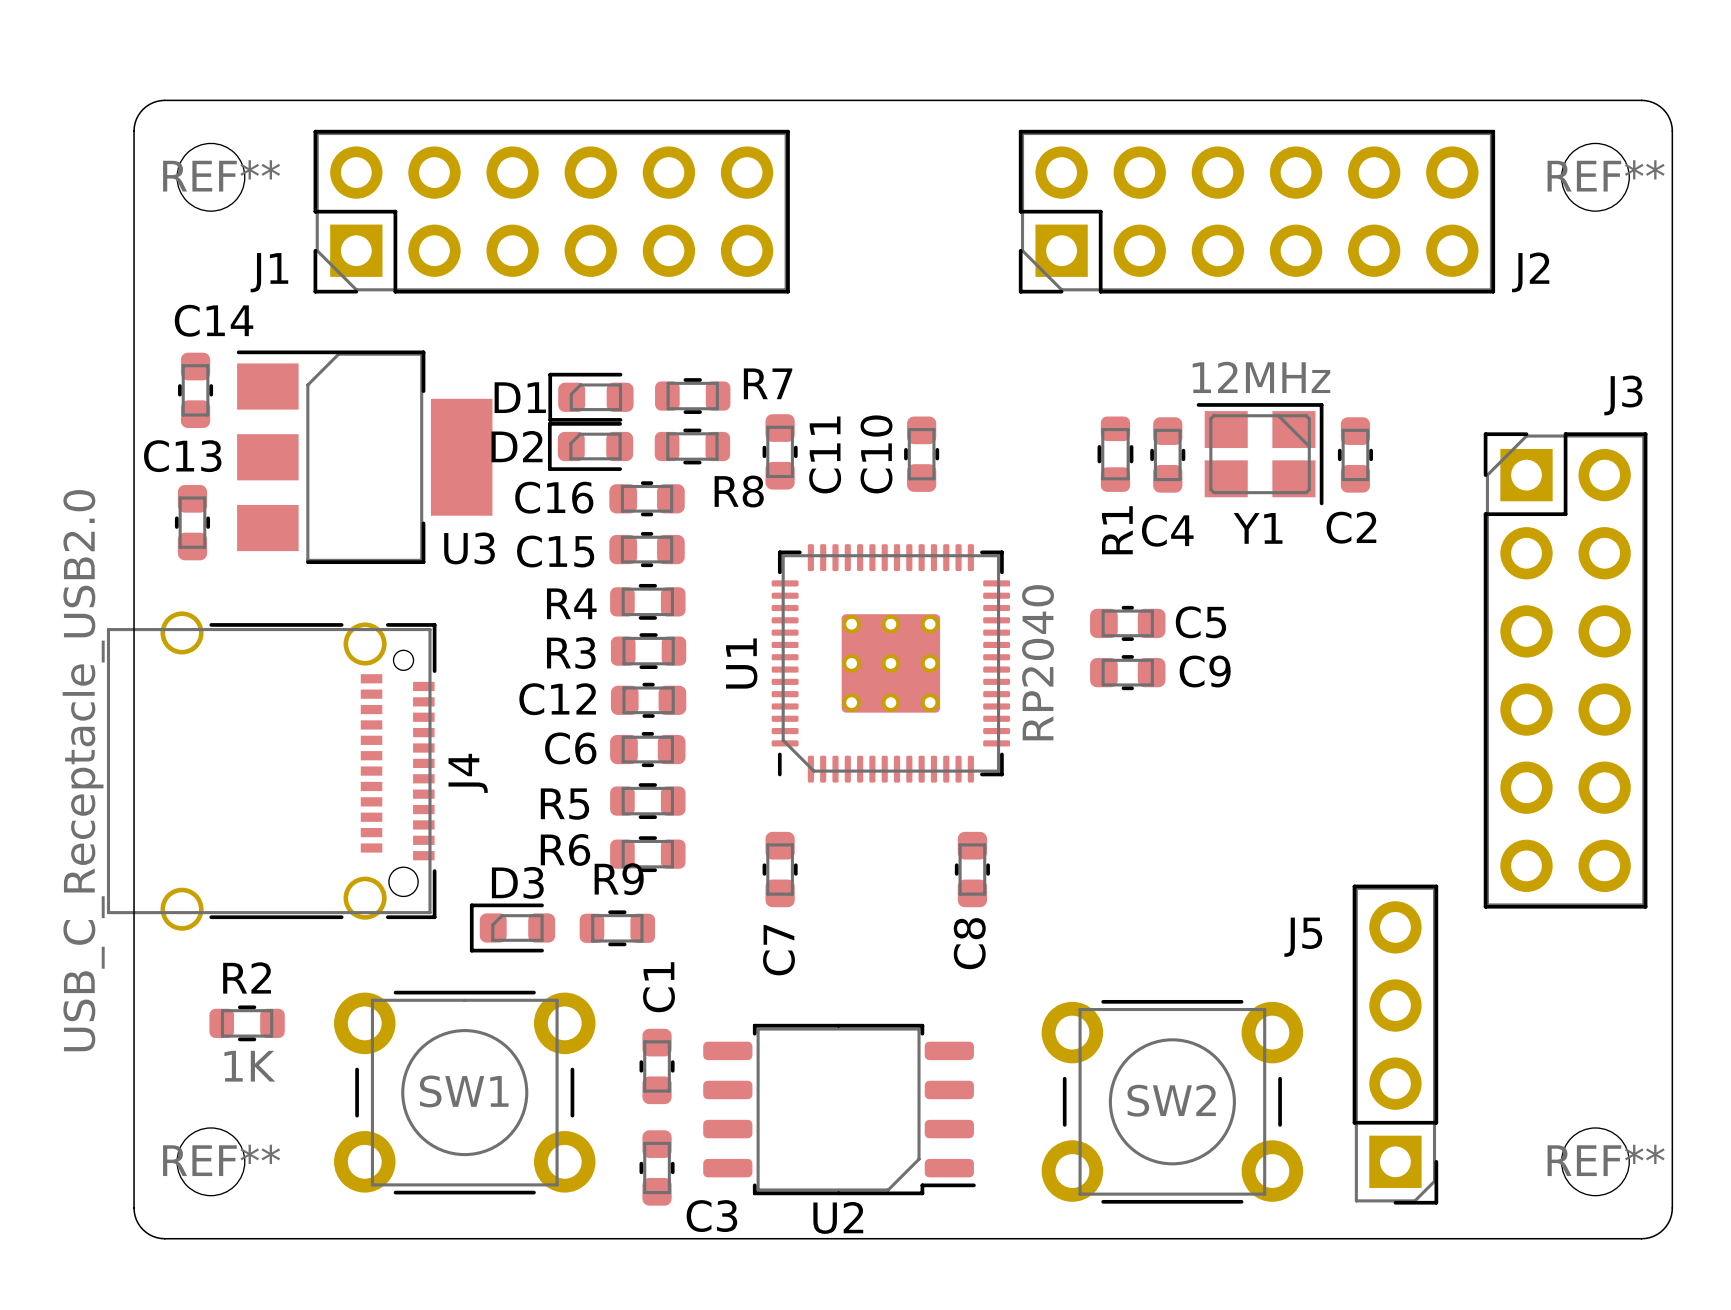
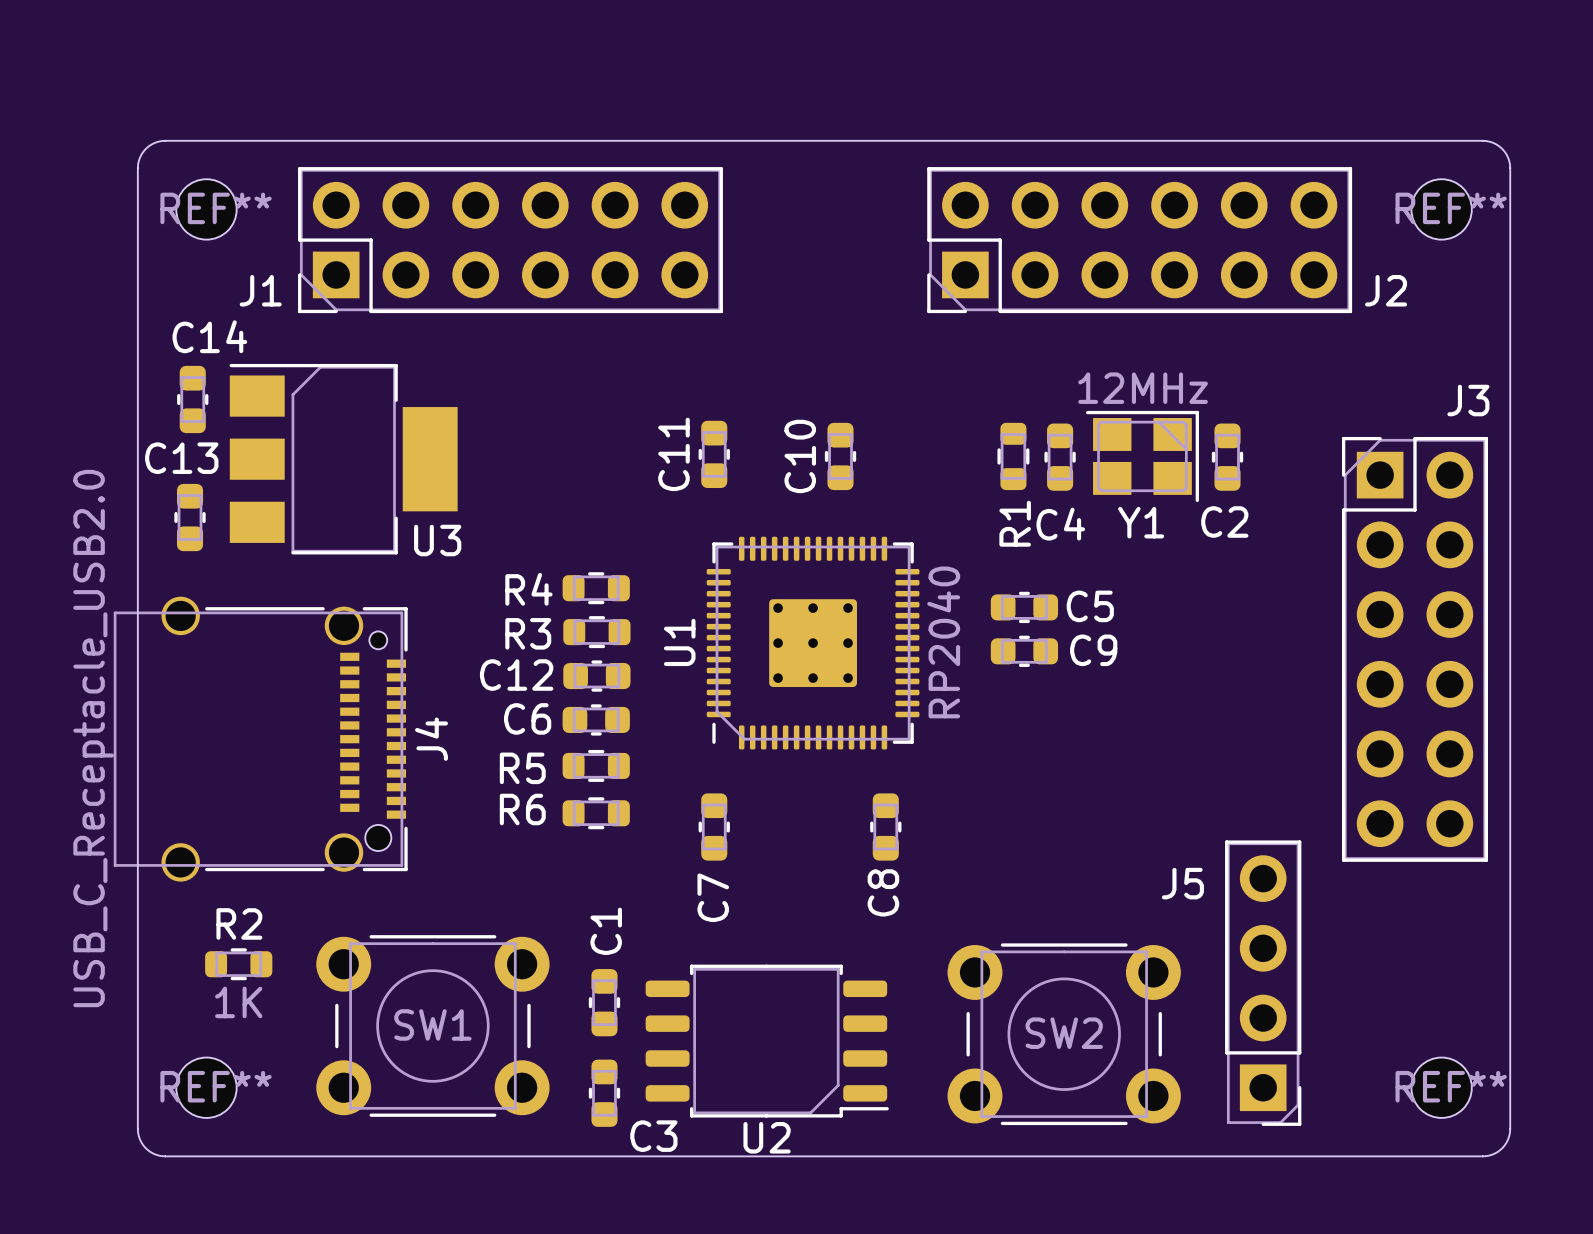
R7: (692, 396) -> none
D1: (590, 397) -> none
D2: (590, 446) -> none
R8: (692, 446) -> none
C11 name position: C11 (825, 454) -> C11 (673, 454)
C16: (647, 498) -> none
C15: (647, 549) -> none
D3: (512, 927) -> none
R9: (617, 928) -> none

